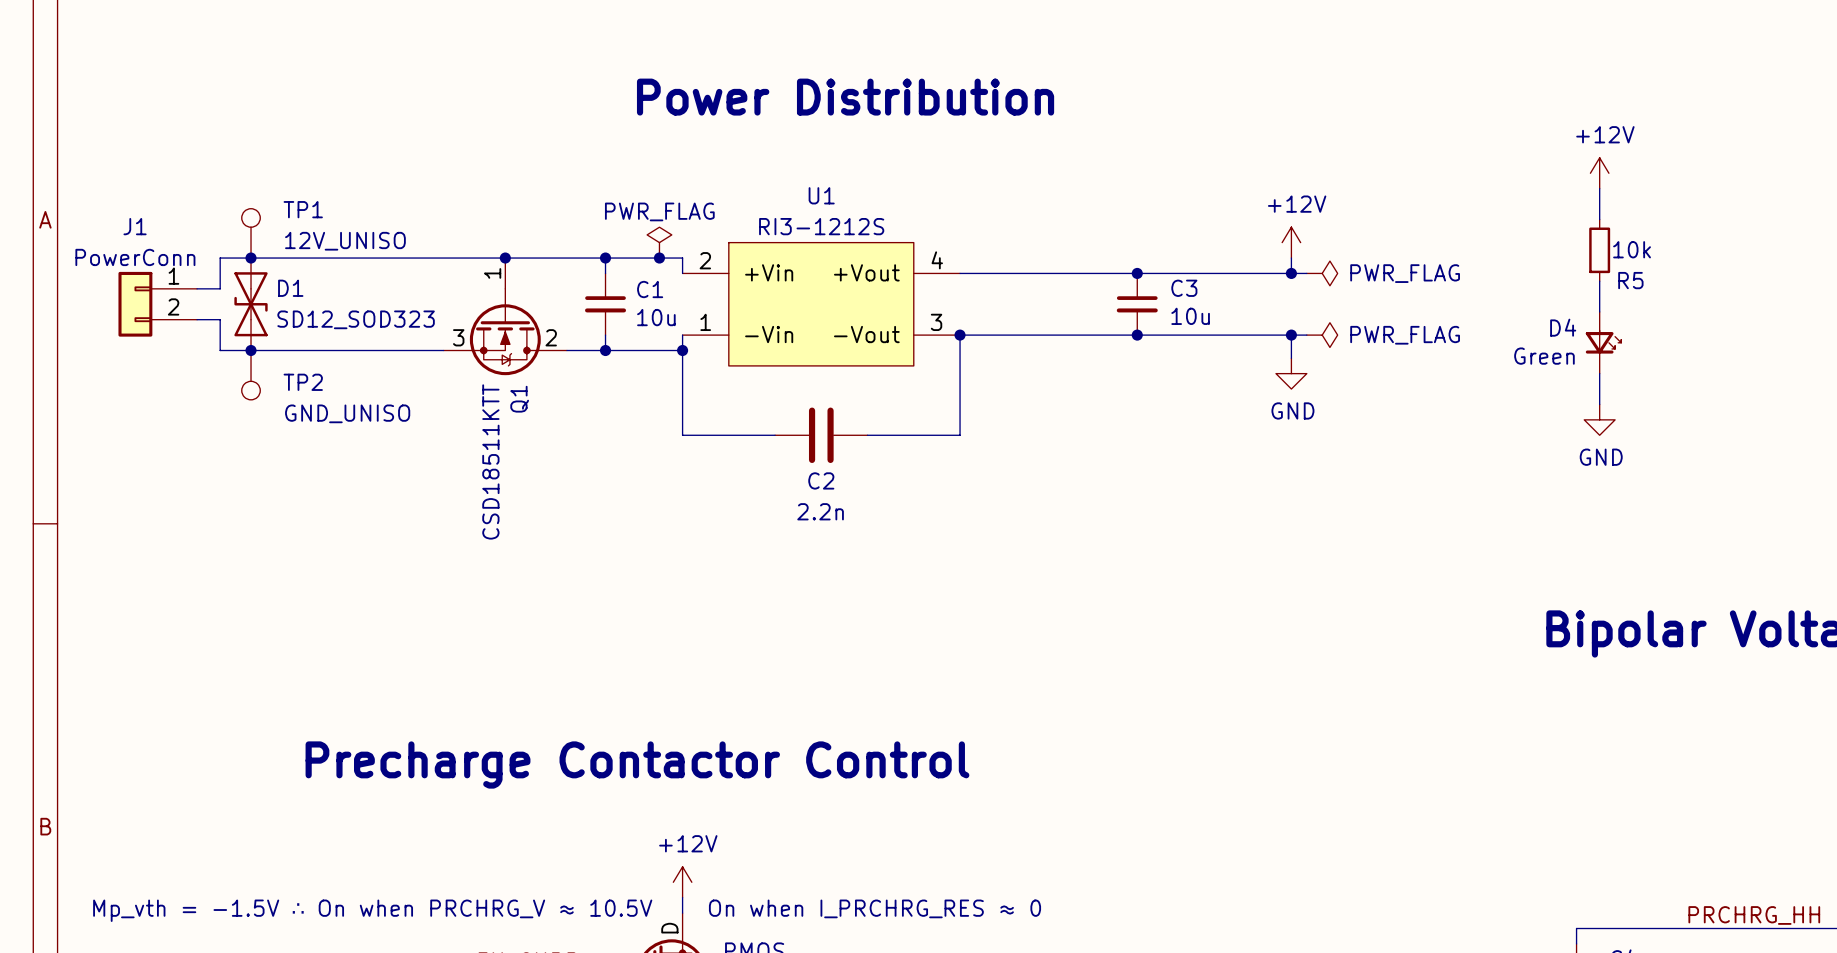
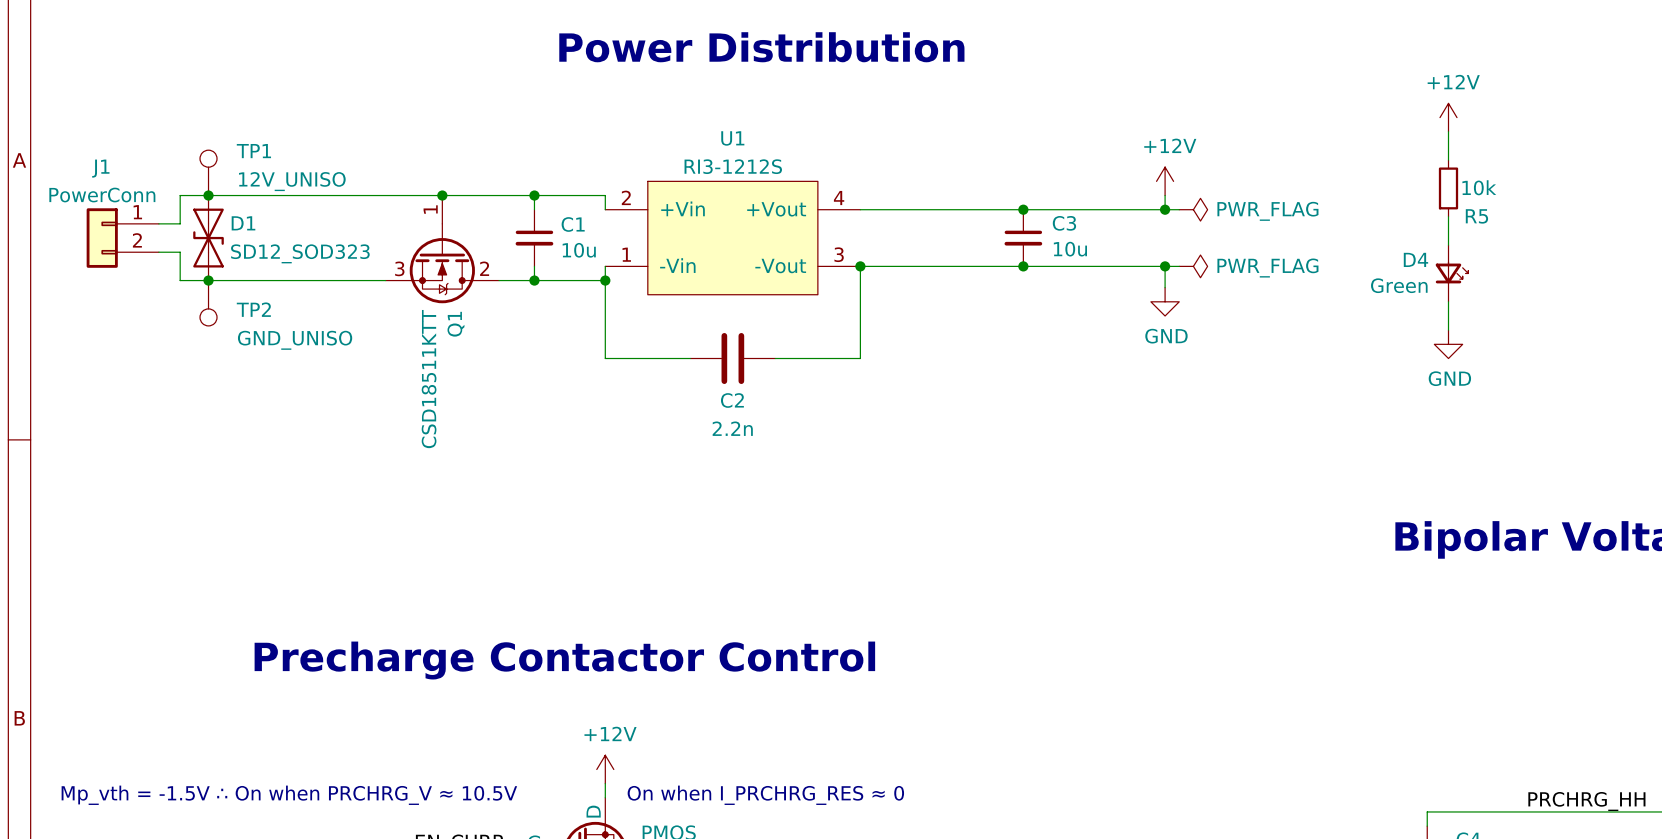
power symbol: PWR_FLAG (659, 242) -> none
junction: (659, 258) -> none

